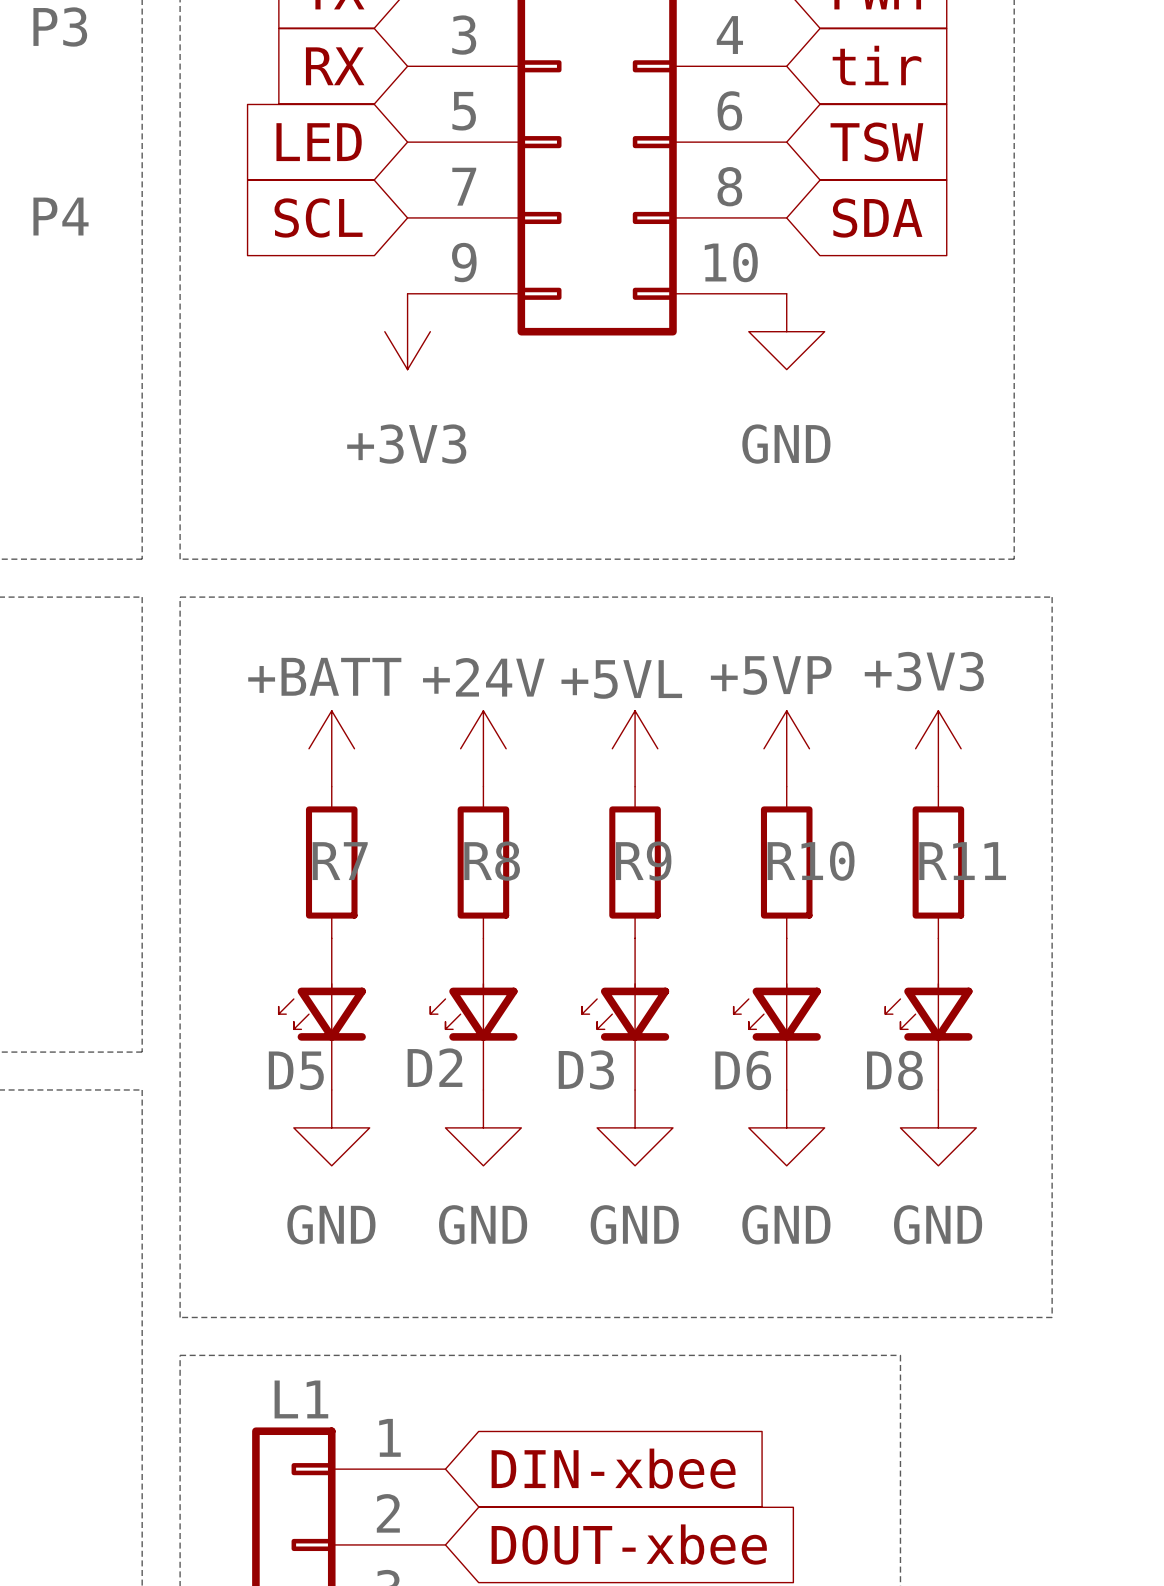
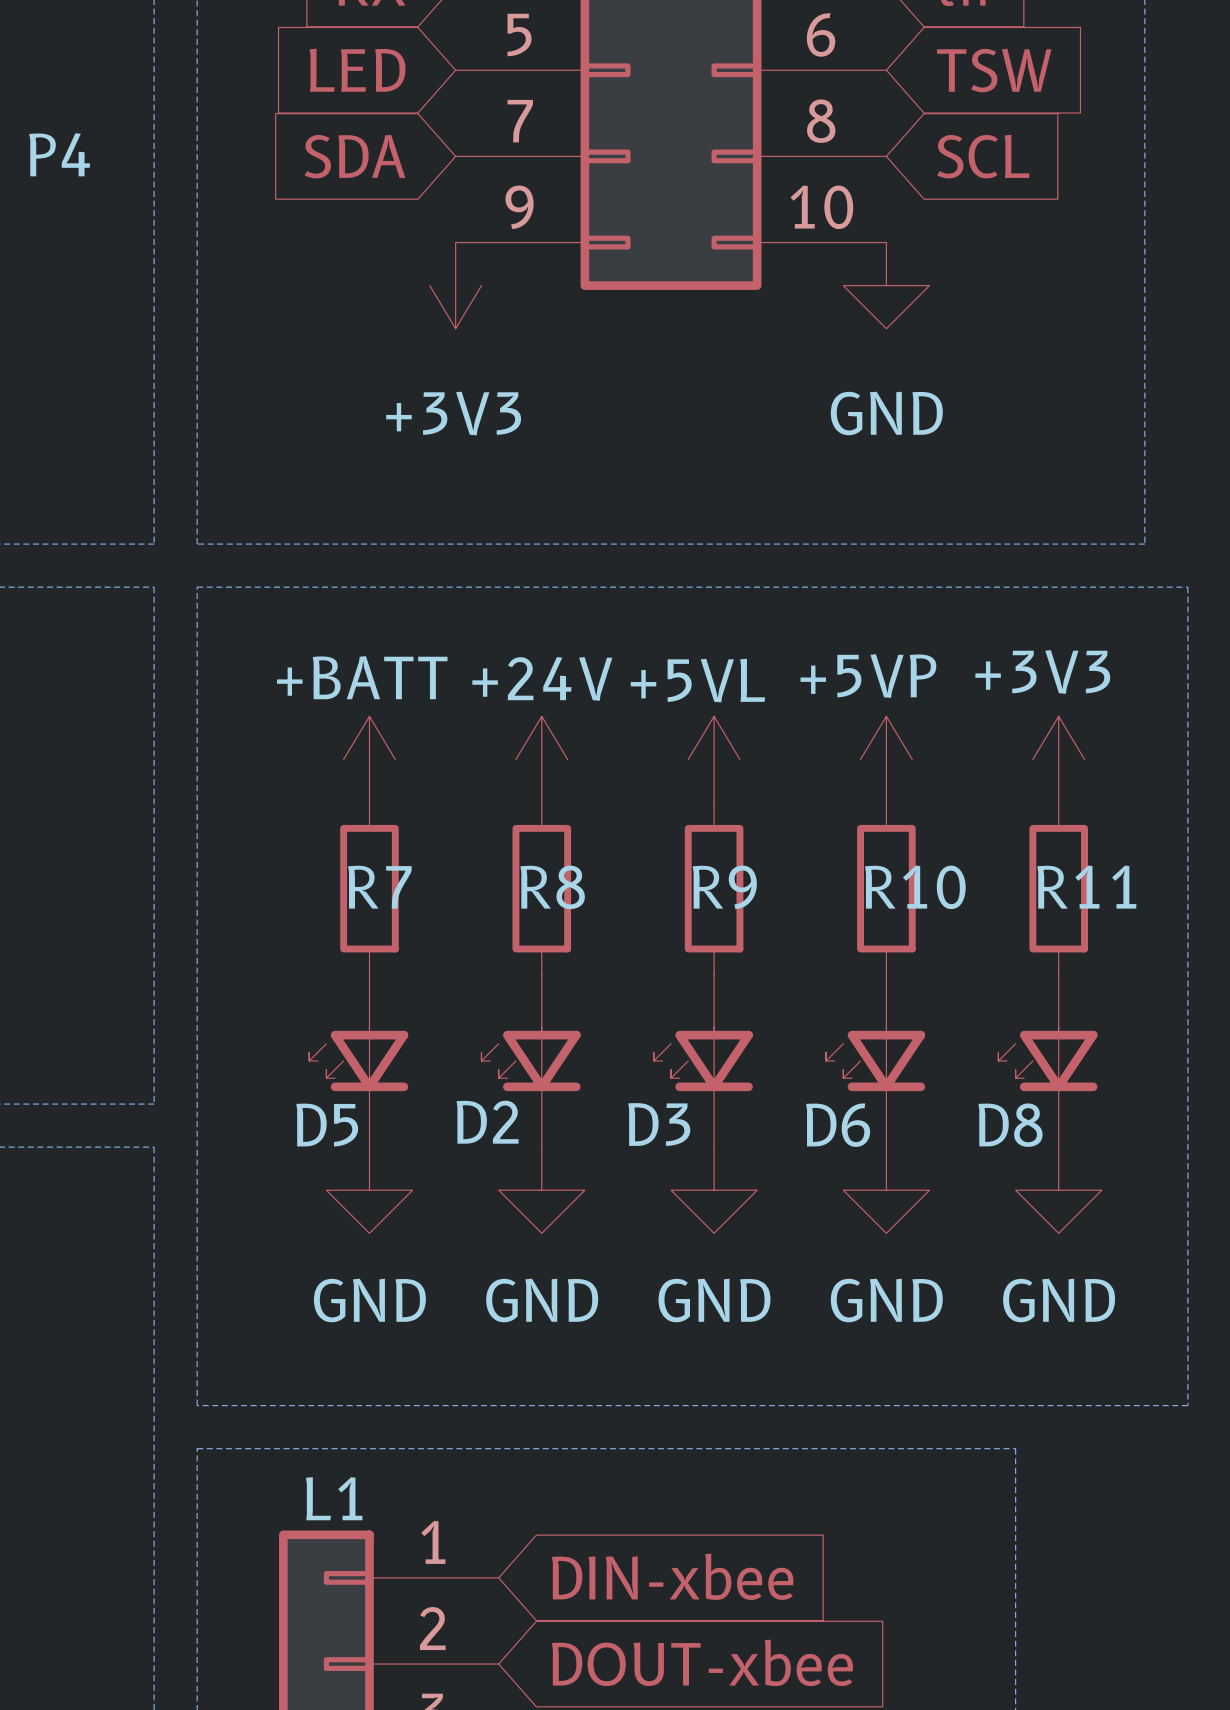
global label: SCL (318, 217) -> SDA (354, 156)
global label: SDA (877, 217) -> SCL (983, 156)

